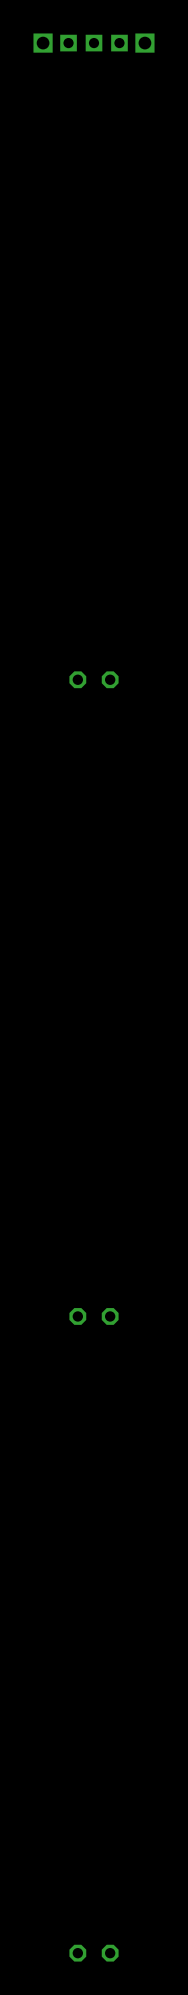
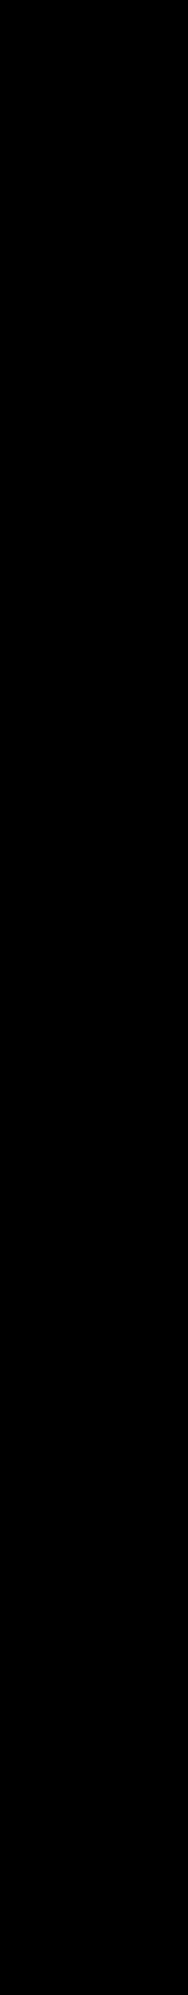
part: (94, 43) -> none
part: (94, 679) -> none
part: (94, 1316) -> none
part: (94, 1953) -> none

